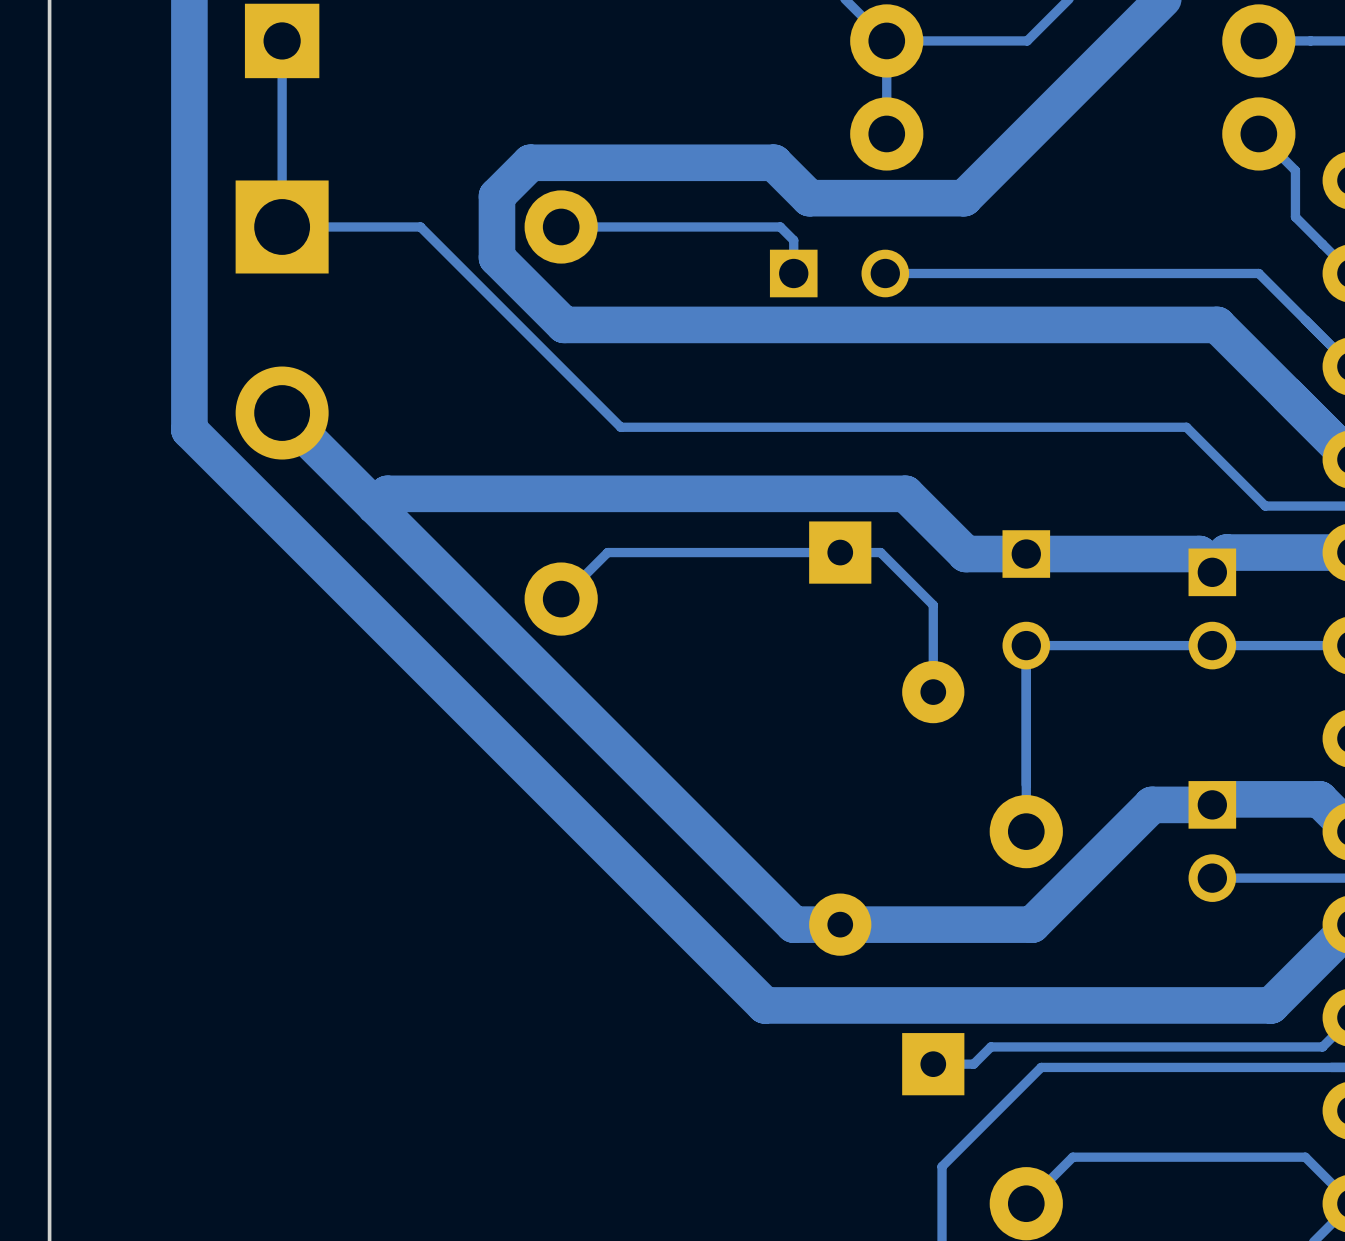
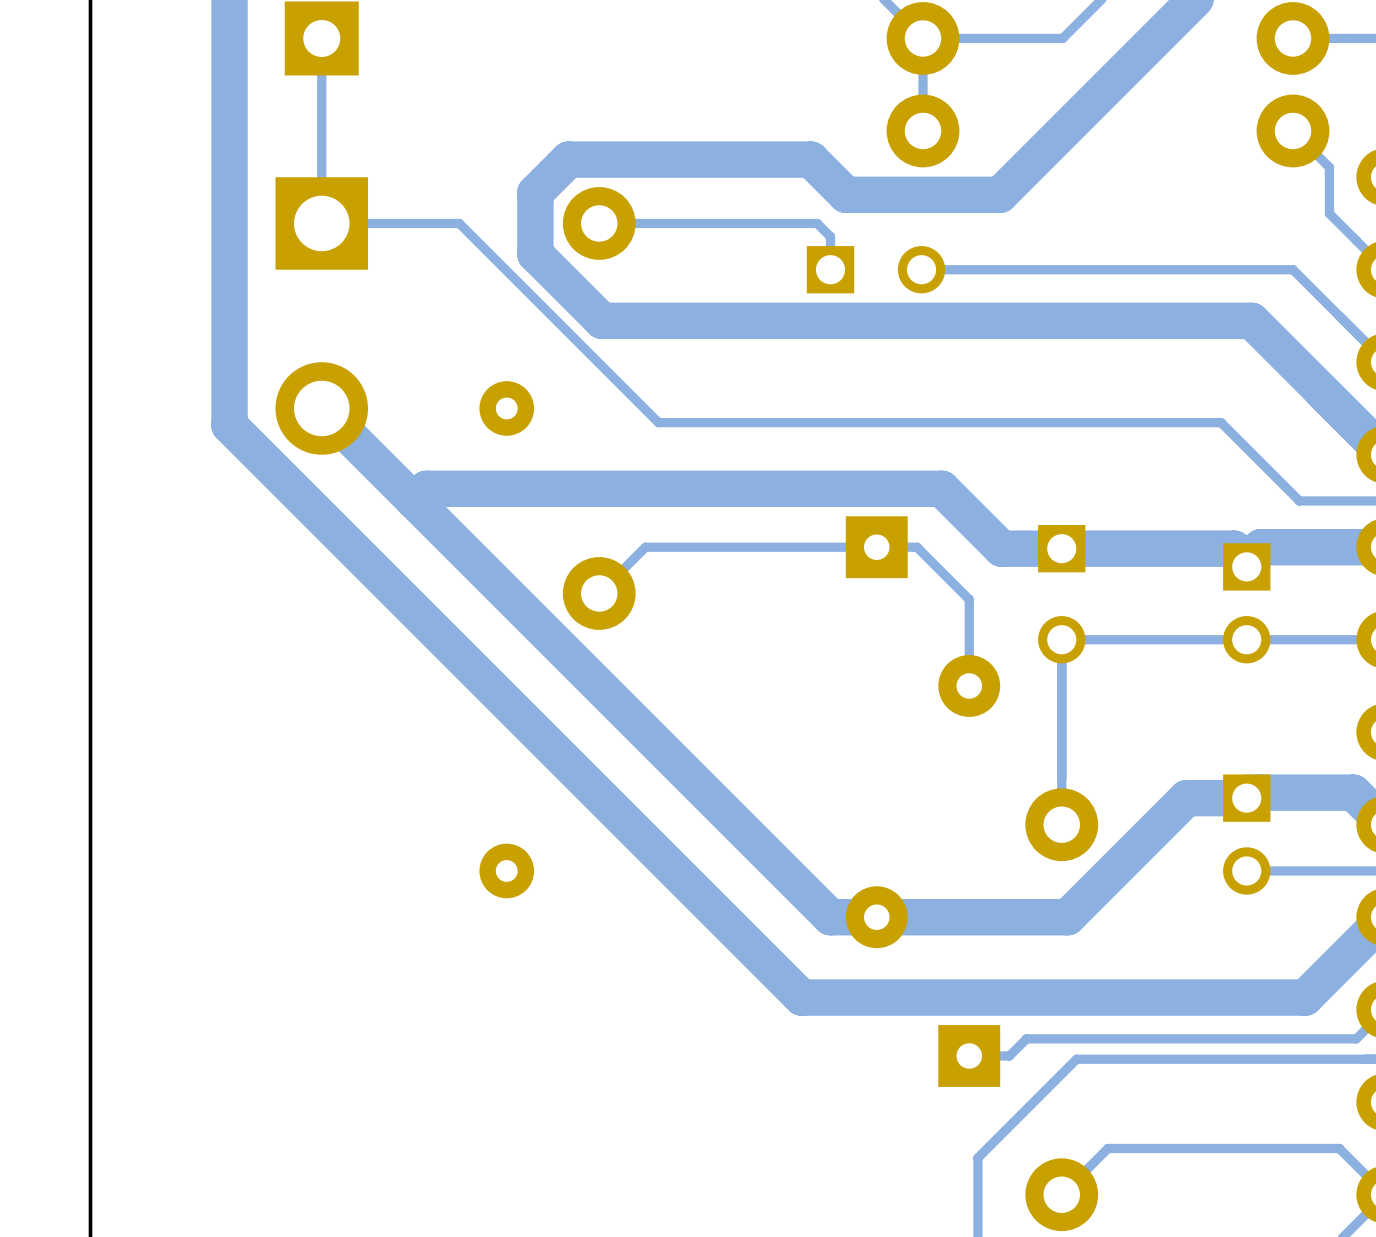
part: none -> (506, 408)
part: none -> (506, 870)

